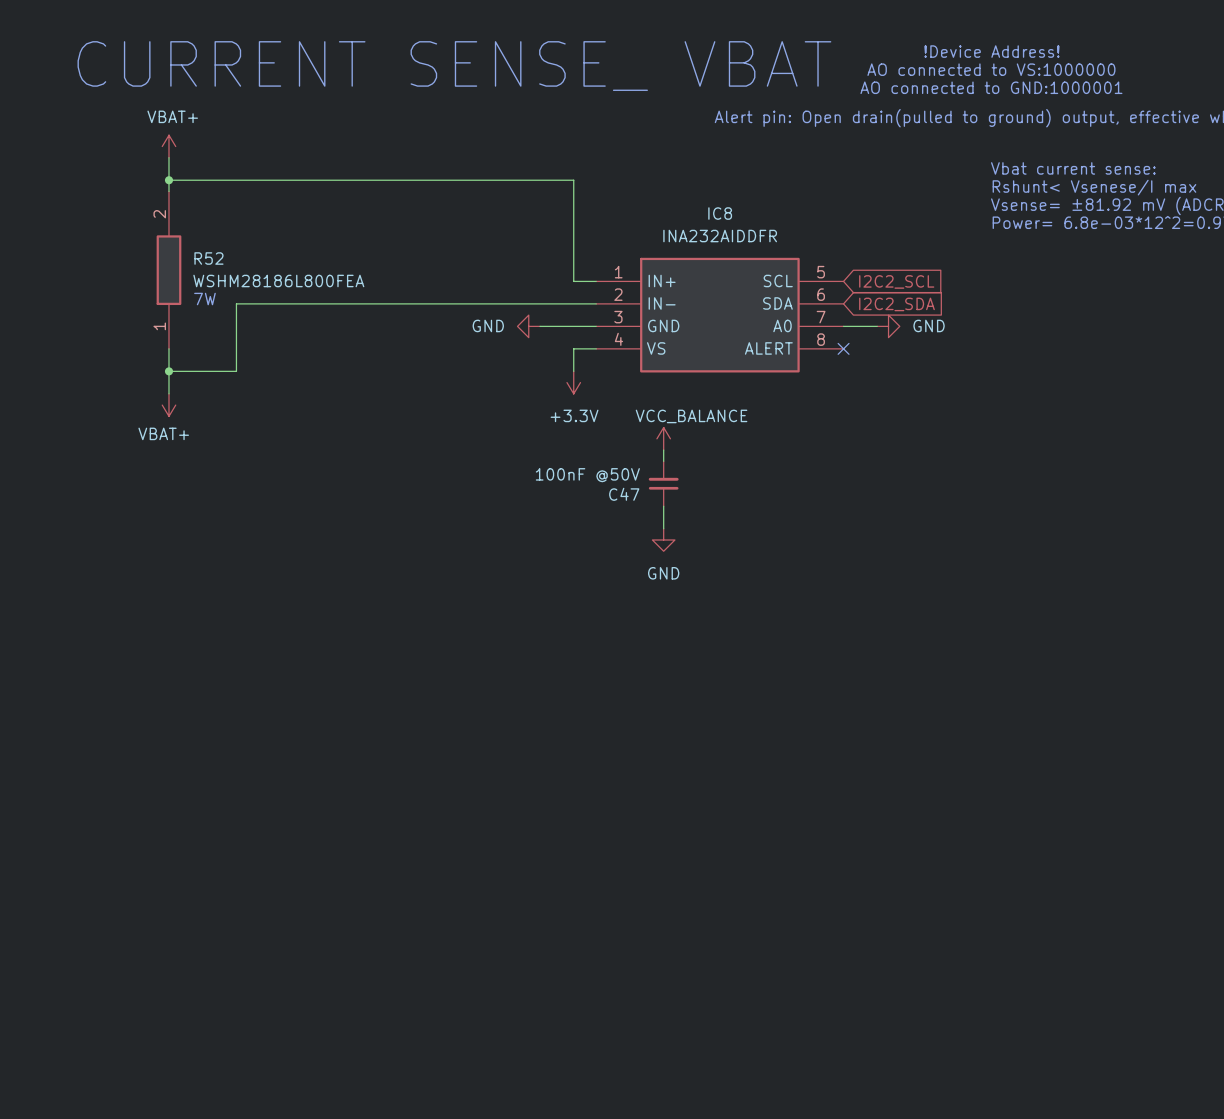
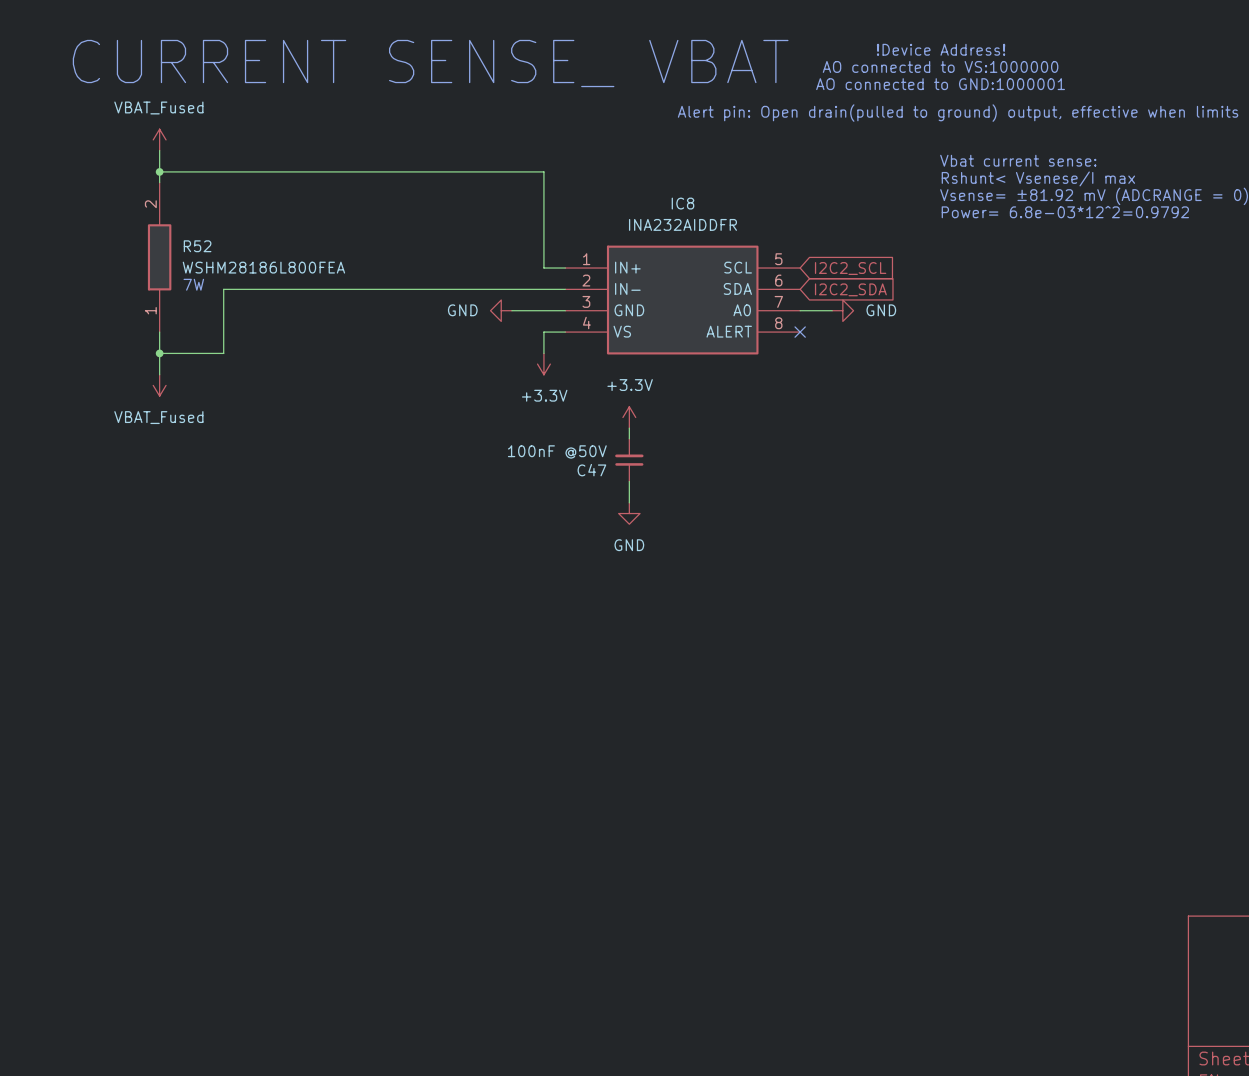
power symbol: VBAT+ (168, 146) -> VBAT_Fused (159, 139)
power symbol: VBAT+ (168, 405) -> VBAT_Fused (159, 385)
power symbol: VCC_BALANCE (663, 438) -> +3.3V (629, 417)

